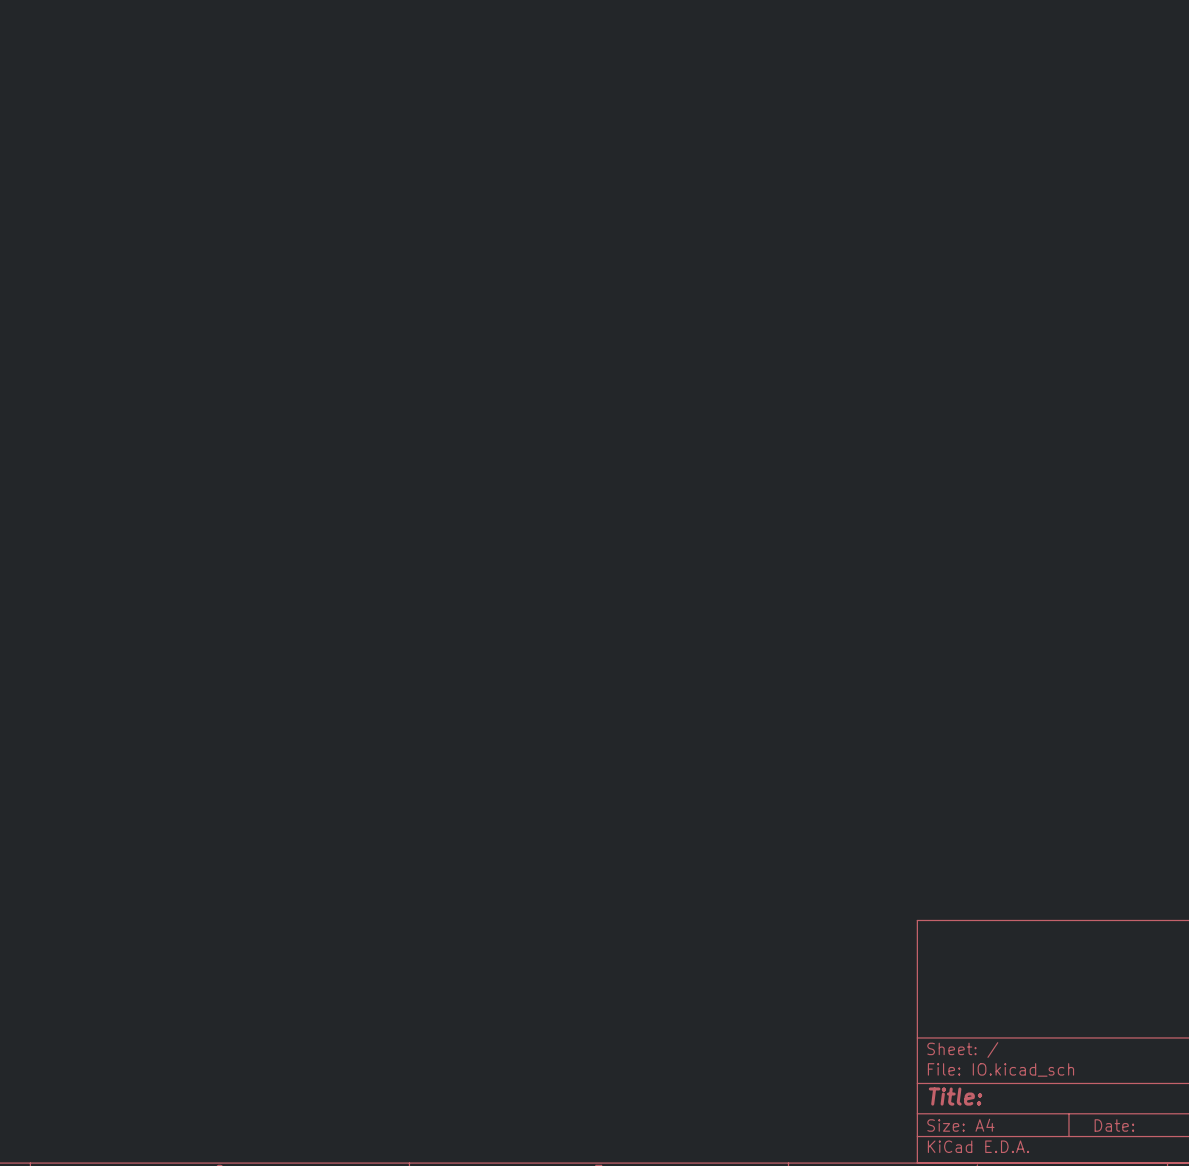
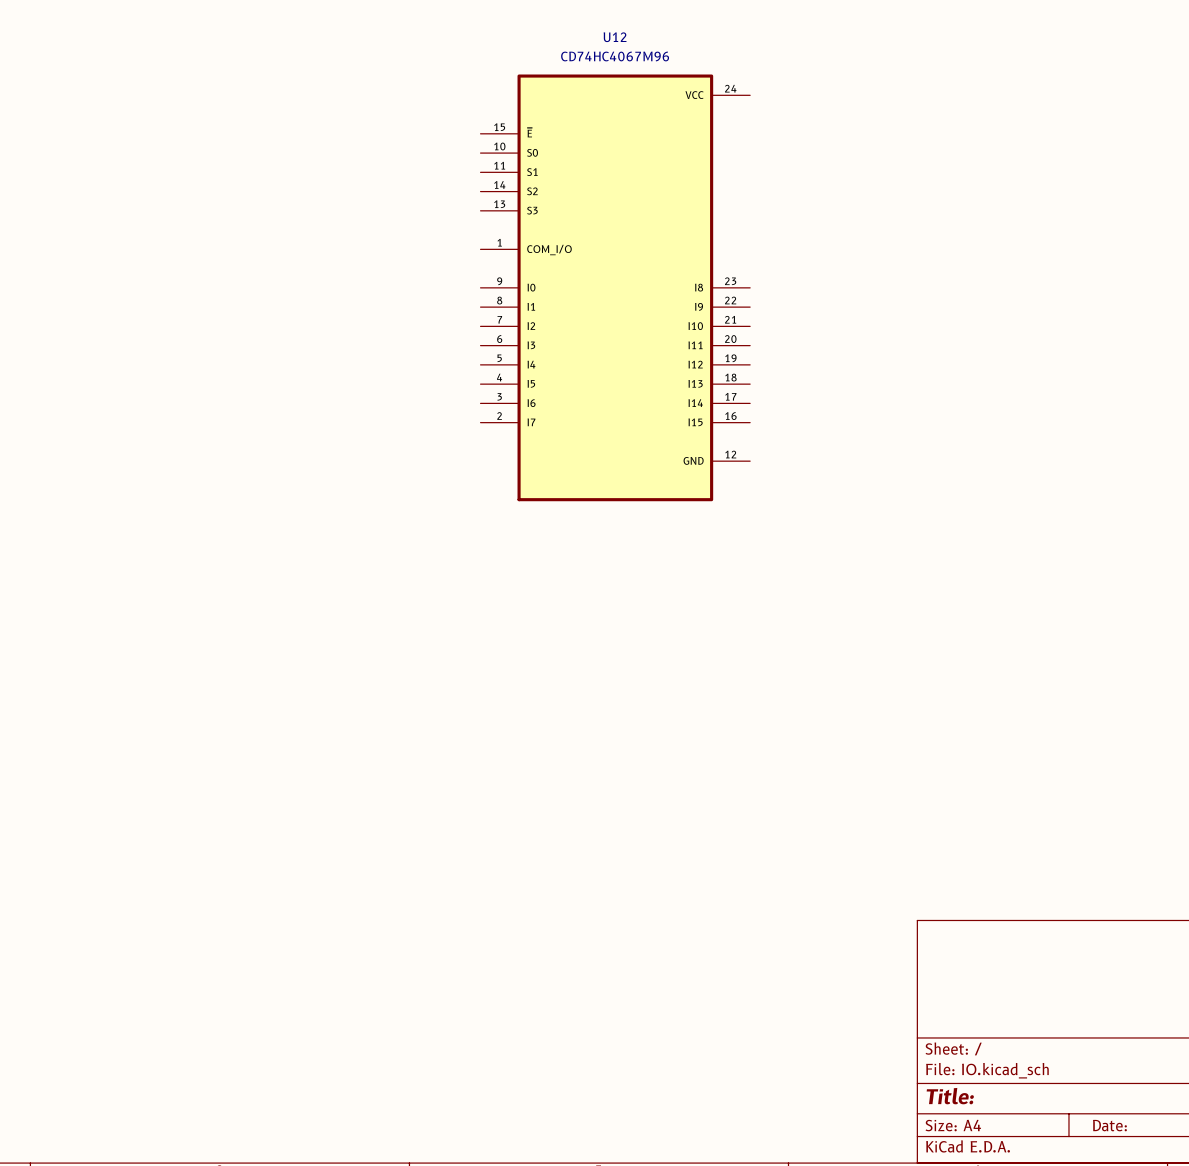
U12: none -> CD74HC4067M96 (615, 287)

